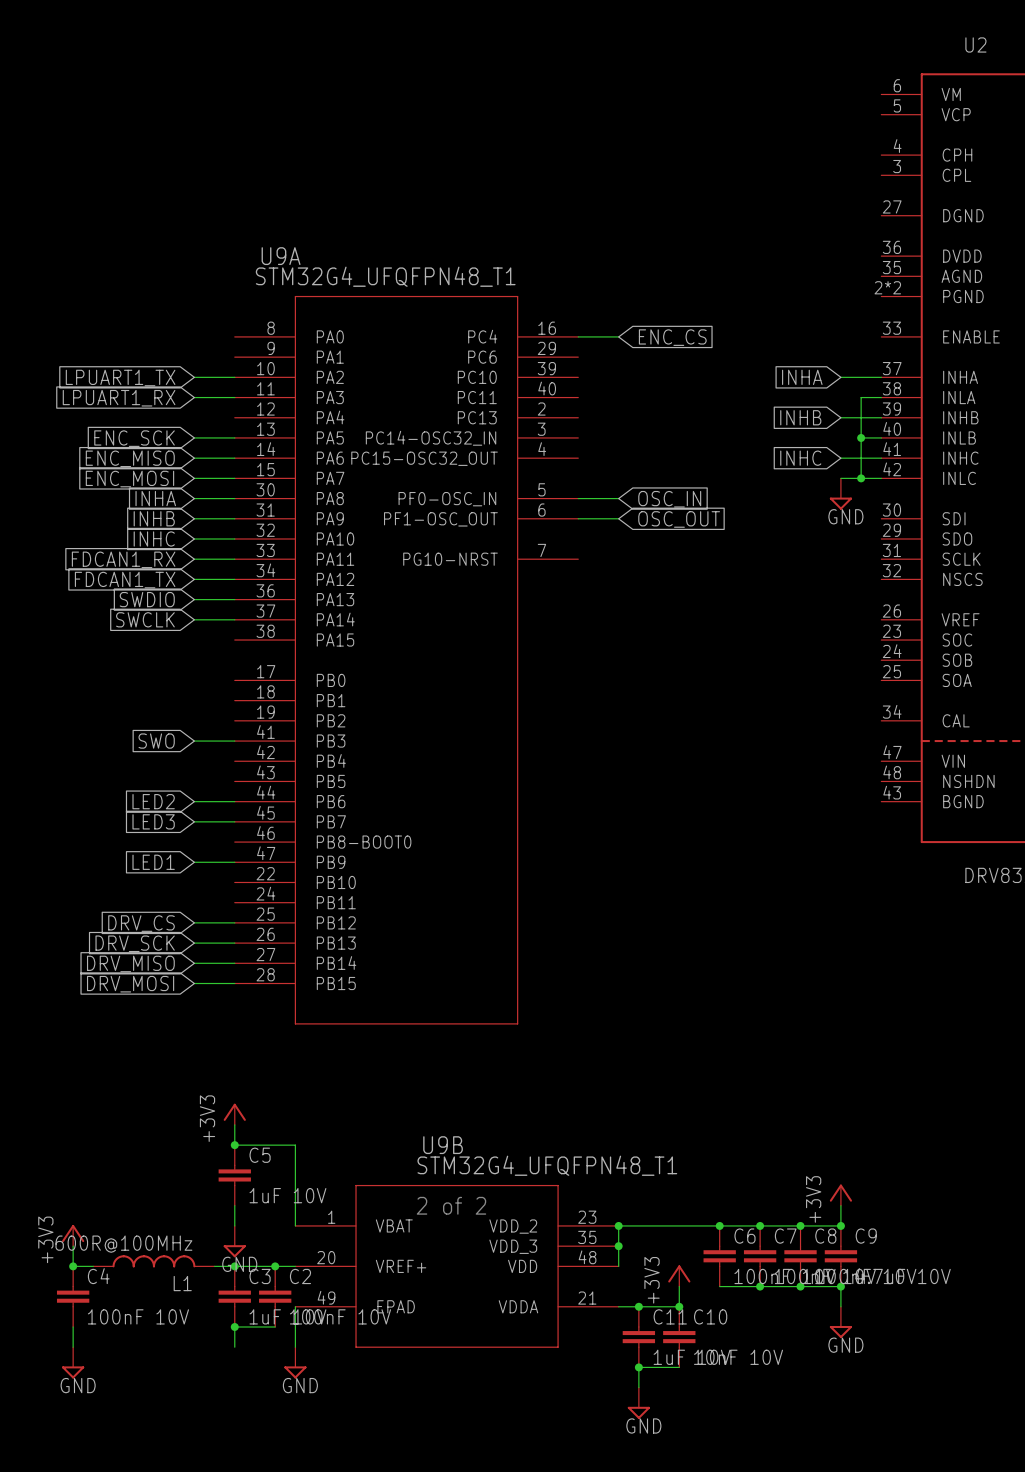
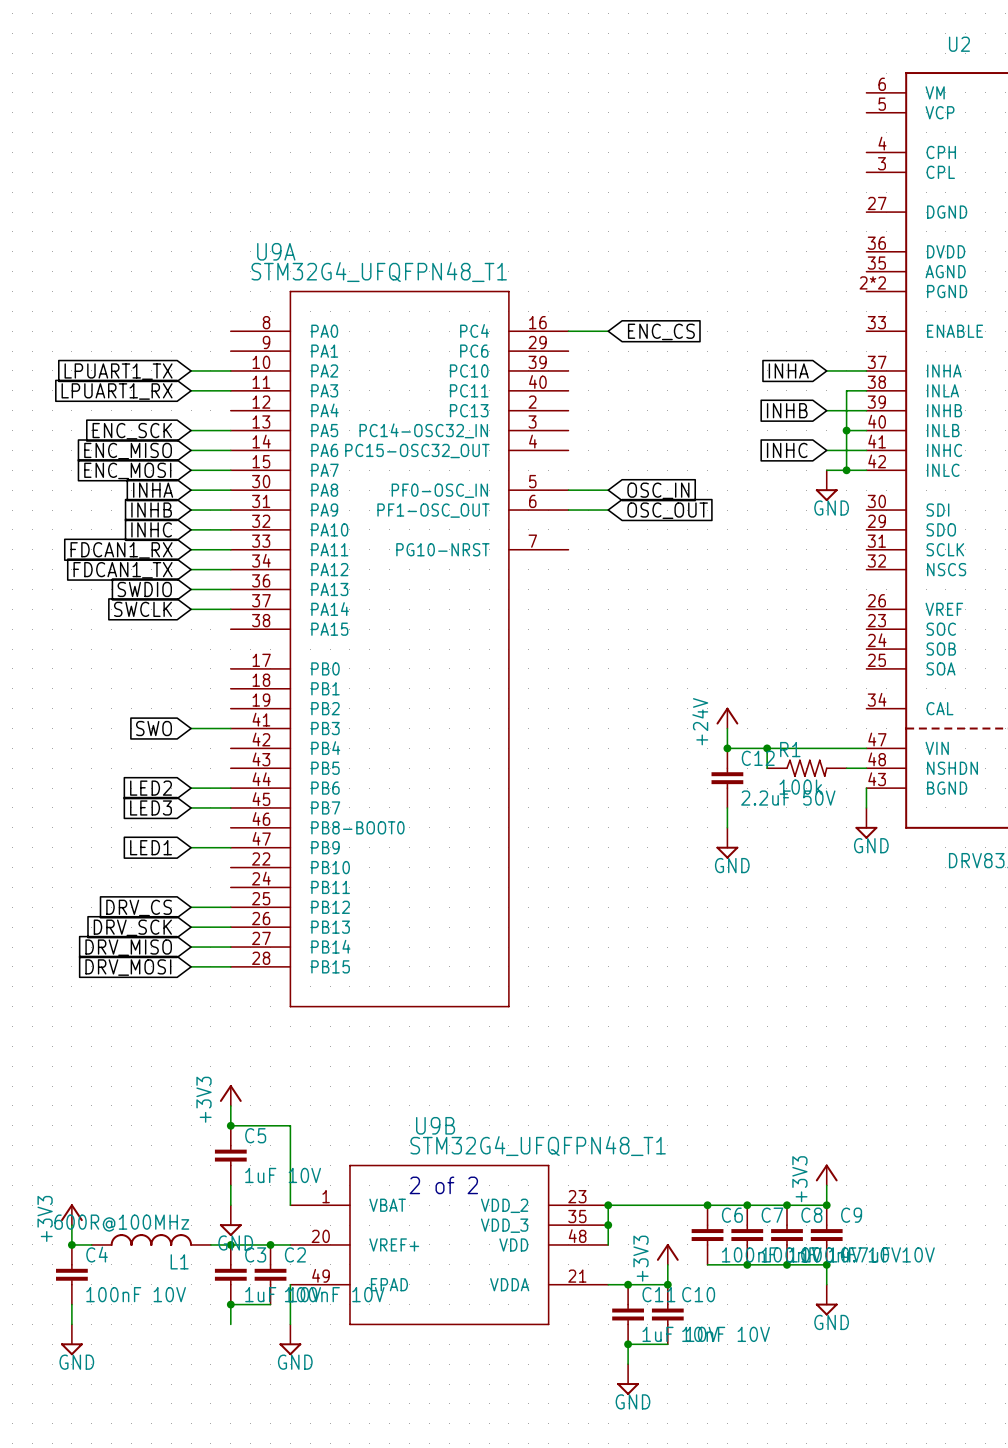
power symbol: none -> +24V (727, 718)
wire: none -> (727, 728) (727, 748) (866, 748)
junction: none -> (727, 748)
wire: none -> (767, 748) (767, 768)
junction: none -> (767, 748)
R1: none -> 100k (806, 768)
wire: none -> (846, 768) (866, 768)
C12: none -> 2.2uF 50V (727, 778)
wire: none -> (866, 788) (866, 807)
wire: none -> (727, 807) (727, 827)
power symbol: none -> GND (866, 823)
power symbol: none -> GND (727, 843)

